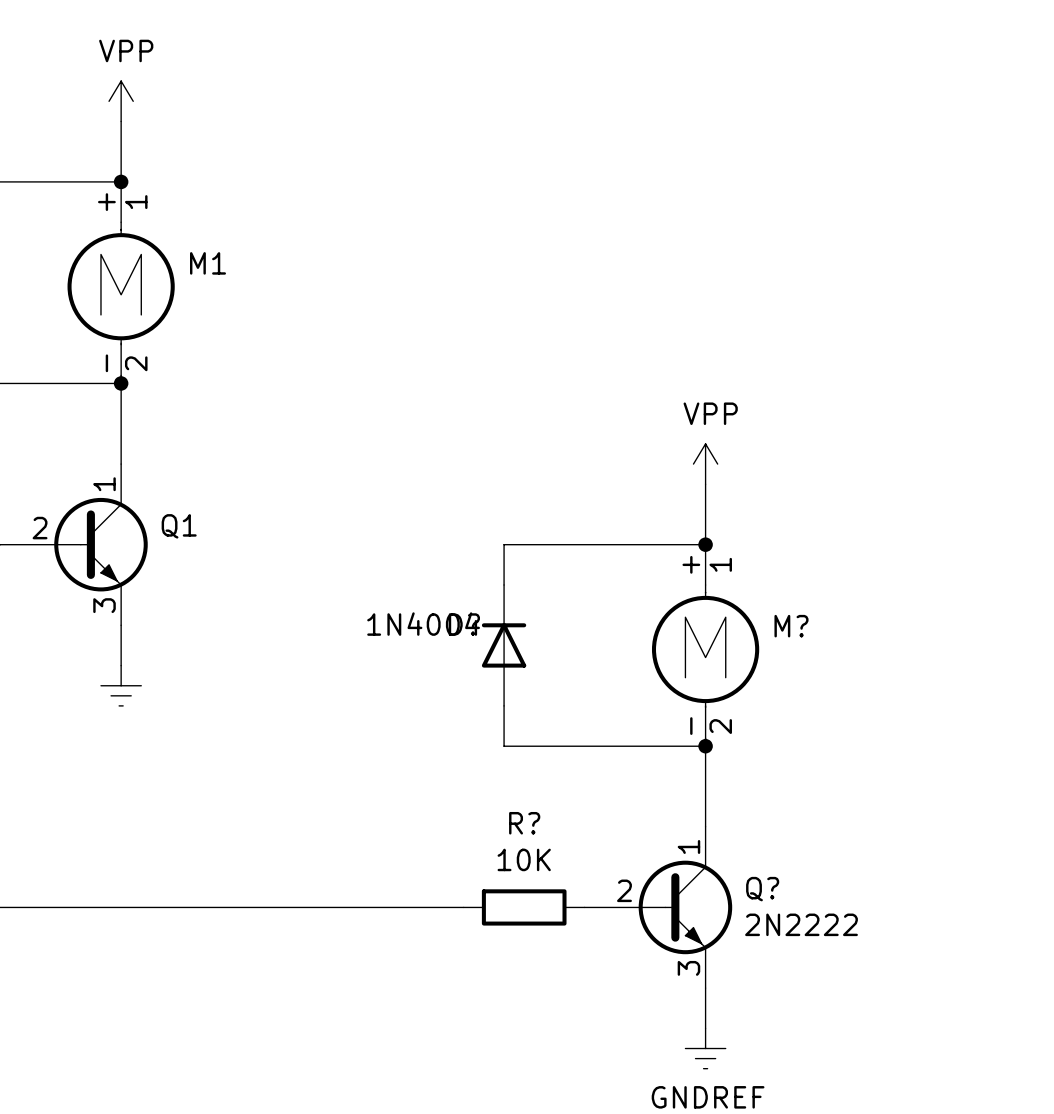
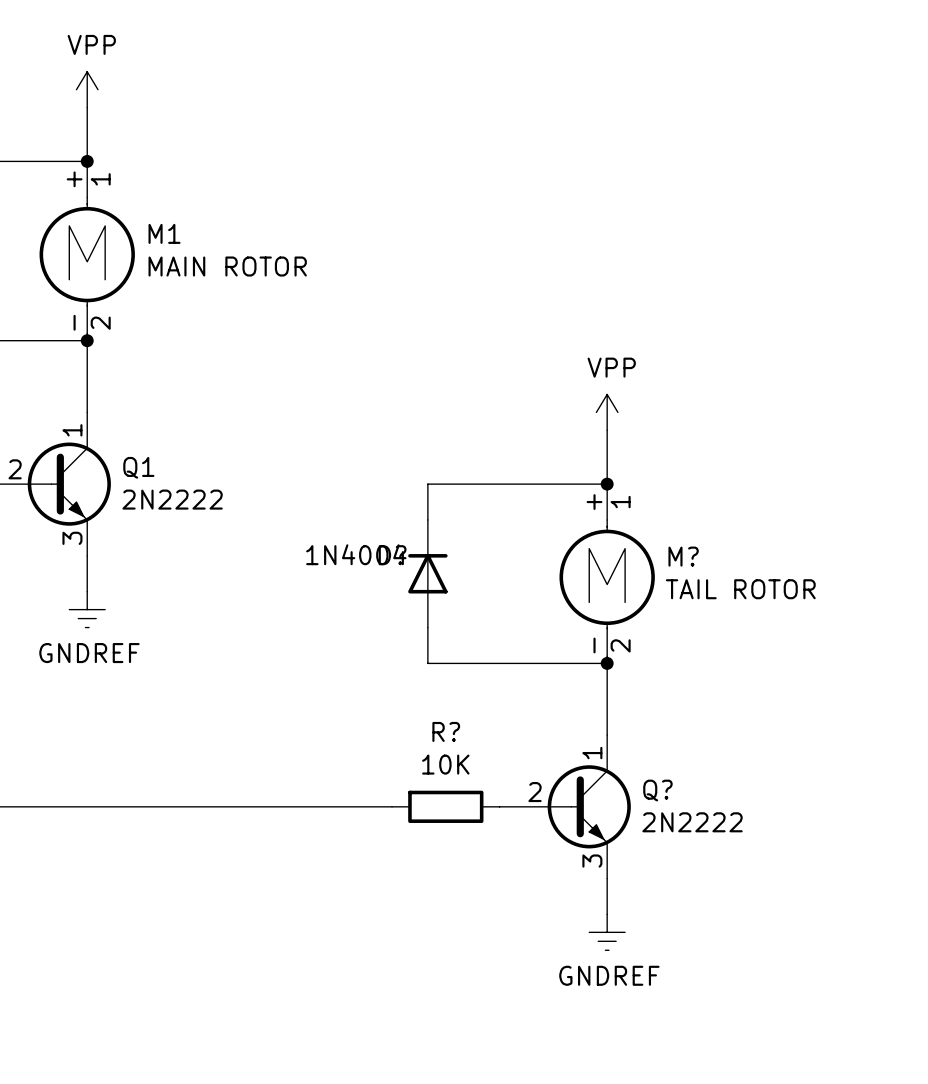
M1 value: none -> MAIN ROTOR (227, 266)
Q1 value: none -> 2N2222 (172, 499)
M? value: none -> TAIL ROTOR (740, 589)
power symbol text: none -> GNDREF (89, 653)

